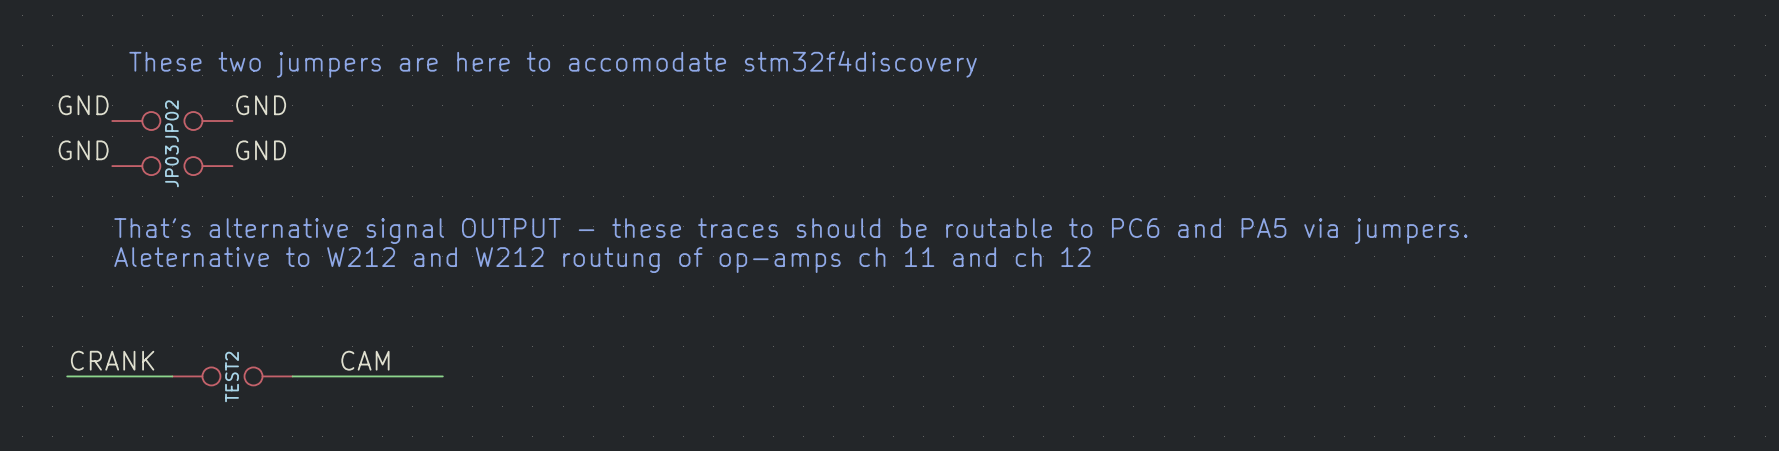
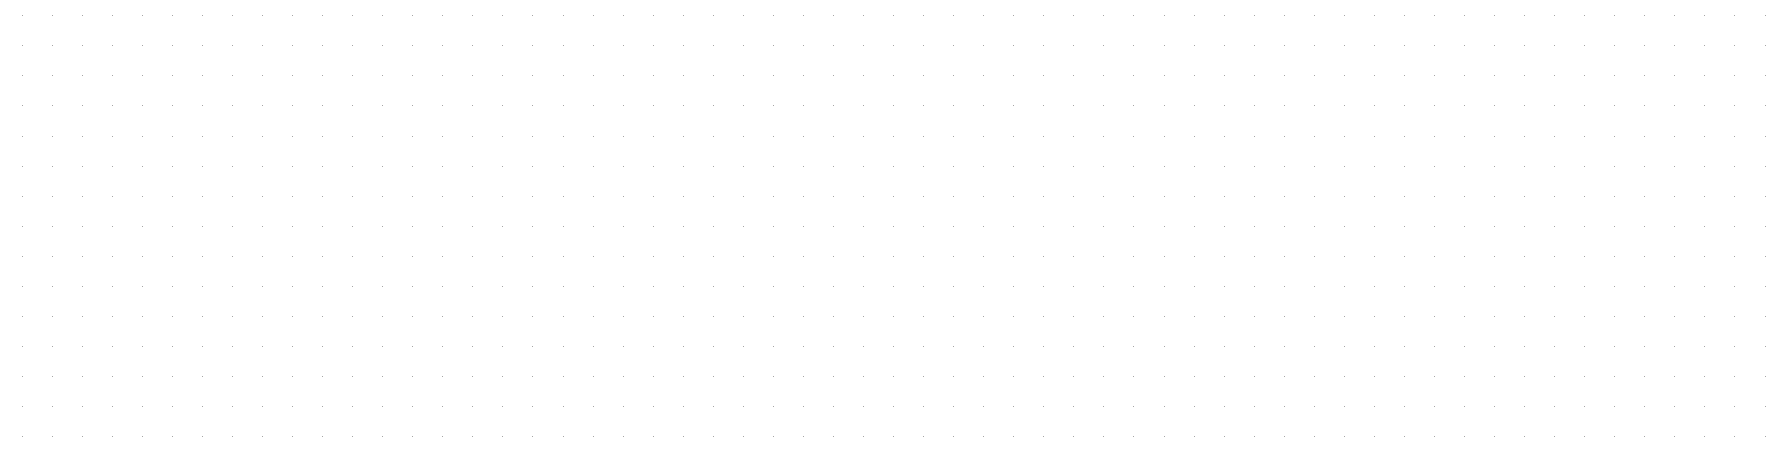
text: These two jumpers are here to accomodate stm32f4discovery (553, 64) -> none
label: GND (83, 105) -> none
label: GND (261, 105) -> none
JP02: (172, 121) -> none
label: GND (83, 150) -> none
label: GND (261, 150) -> none
JP03: (172, 166) -> none
text: That's alternative signal OUTPUT - these traces should be routable to PC6 and PA5 via jumpers. (790, 231) -> none
text: Aleternative to W212 and W212 routung of op-amps ch 11 and ch 12 (602, 260) -> none
label: CRANK (112, 360) -> none
label: CAM (365, 360) -> none
wire: (67, 376) (172, 376) -> none
TEST2: (232, 376) -> none
wire: (292, 376) (442, 376) -> none

